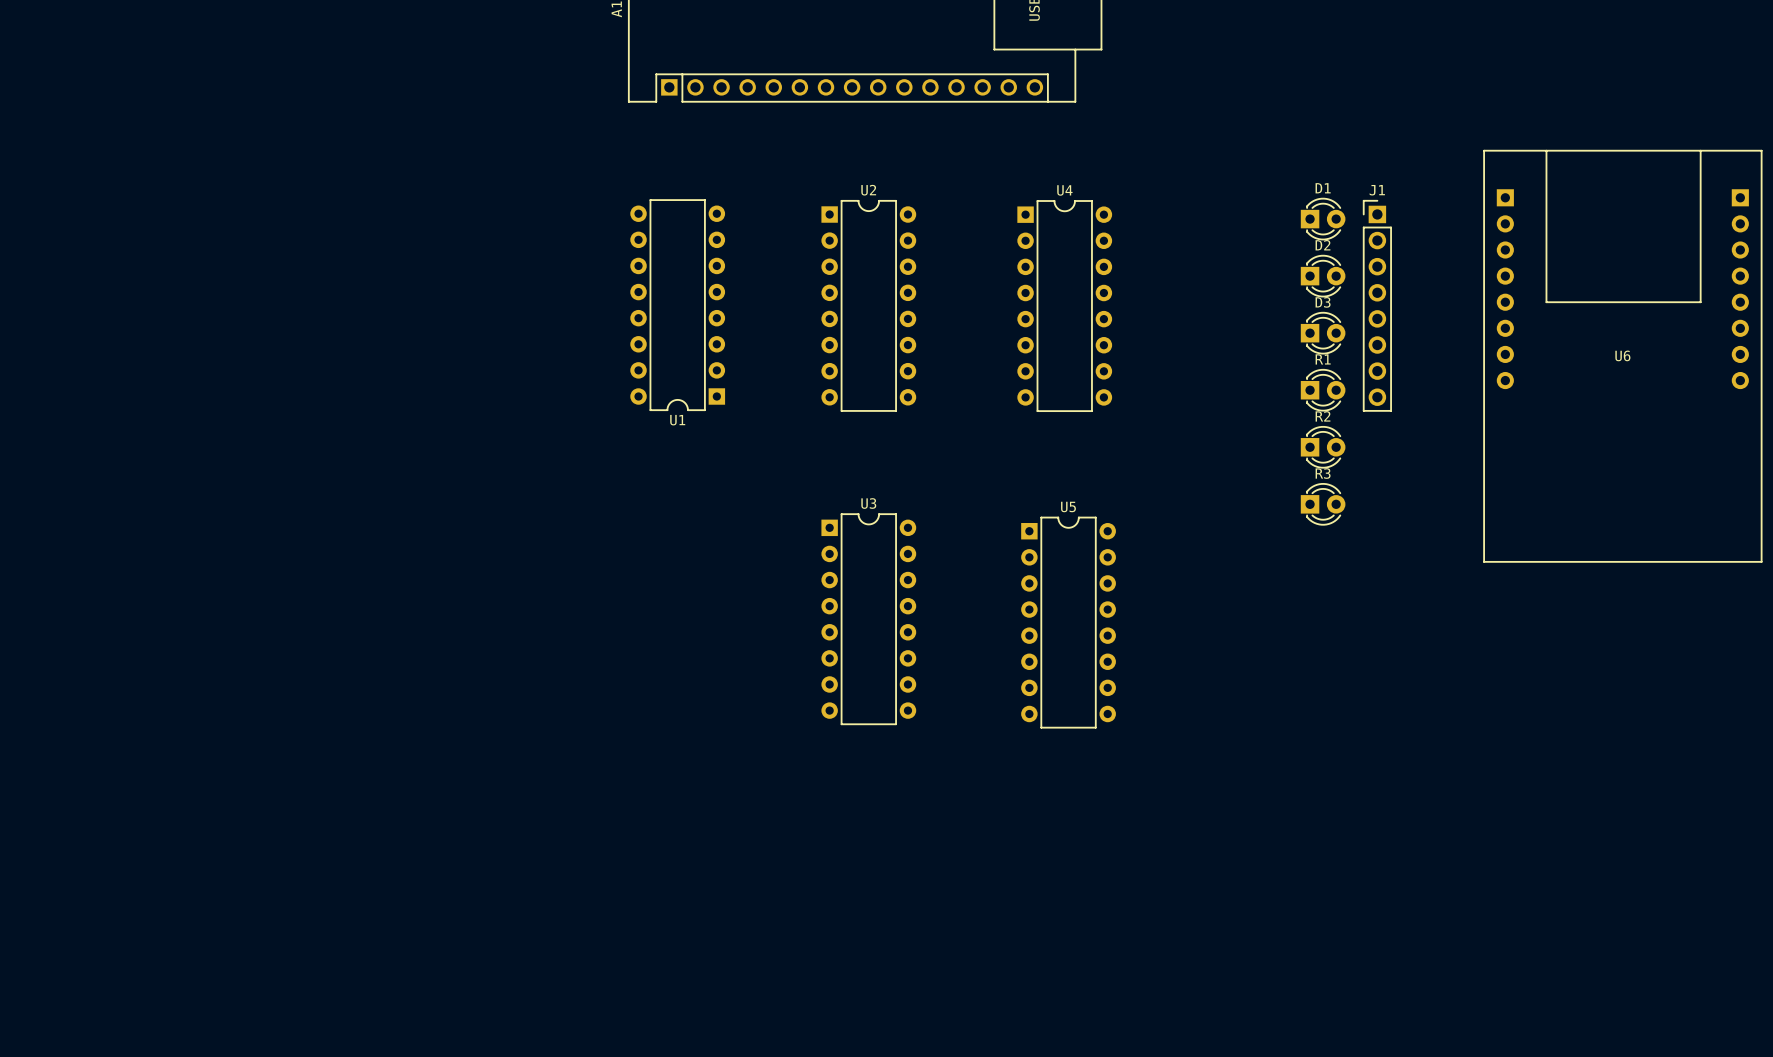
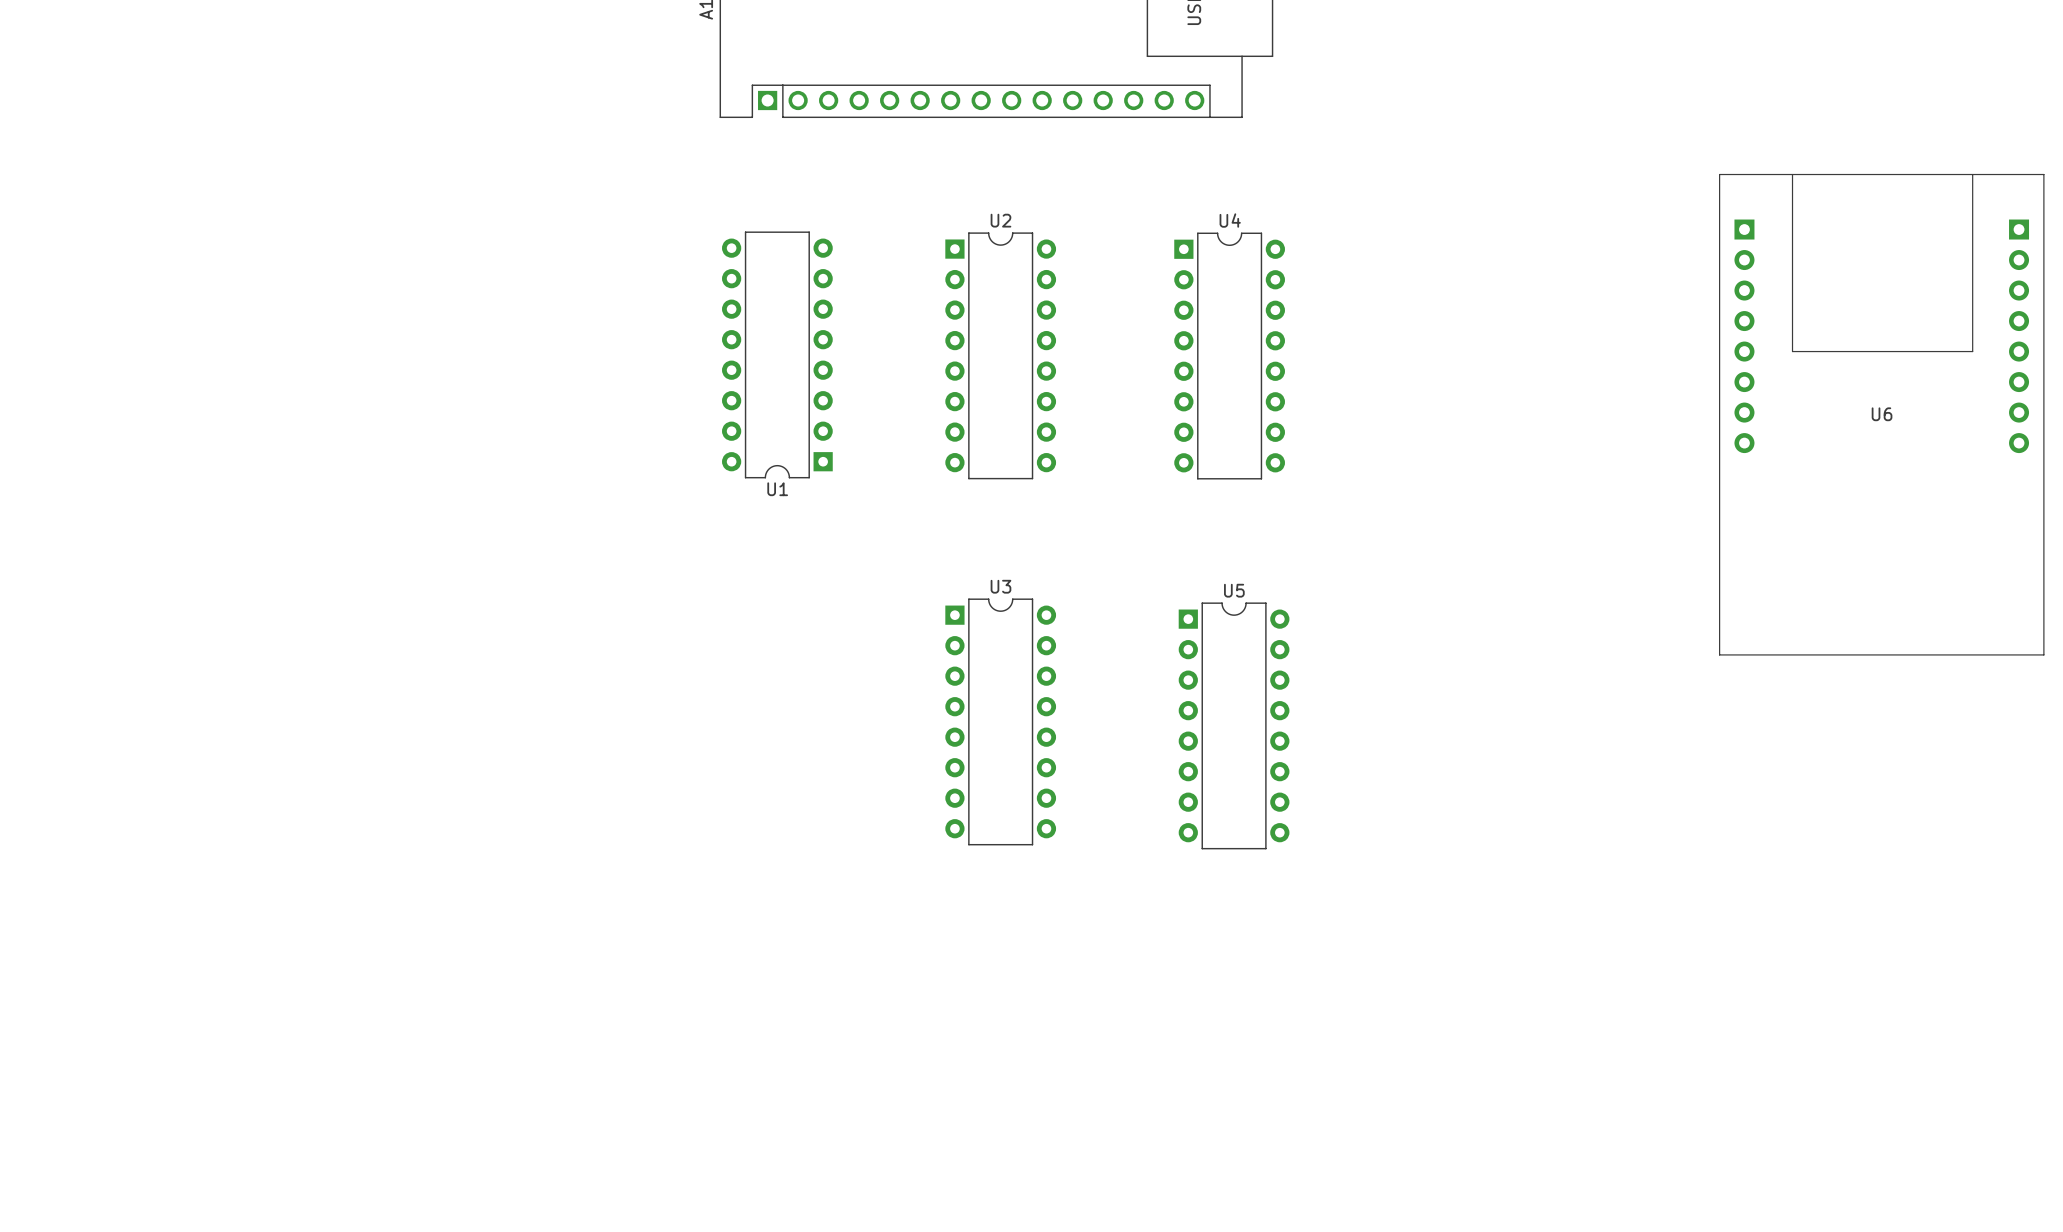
D1: (1323, 219) -> none
D2: (1323, 276) -> none
J1: (1377, 305) -> none
D3: (1323, 333) -> none
R1: (1323, 390) -> none
R2: (1323, 447) -> none
R3: (1323, 504) -> none

